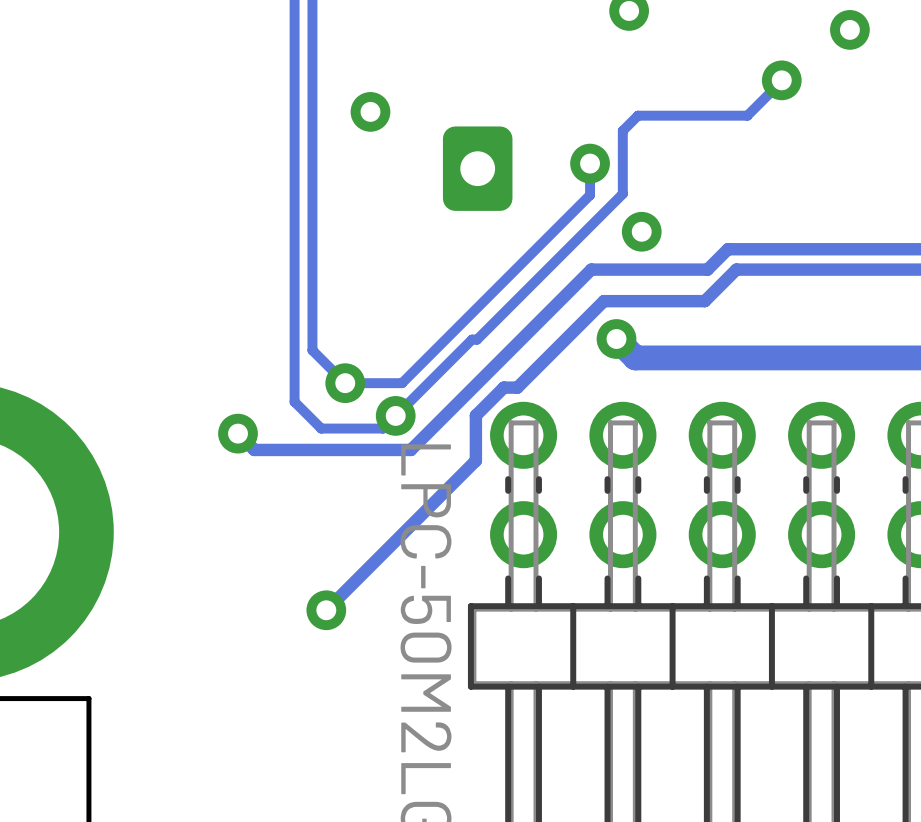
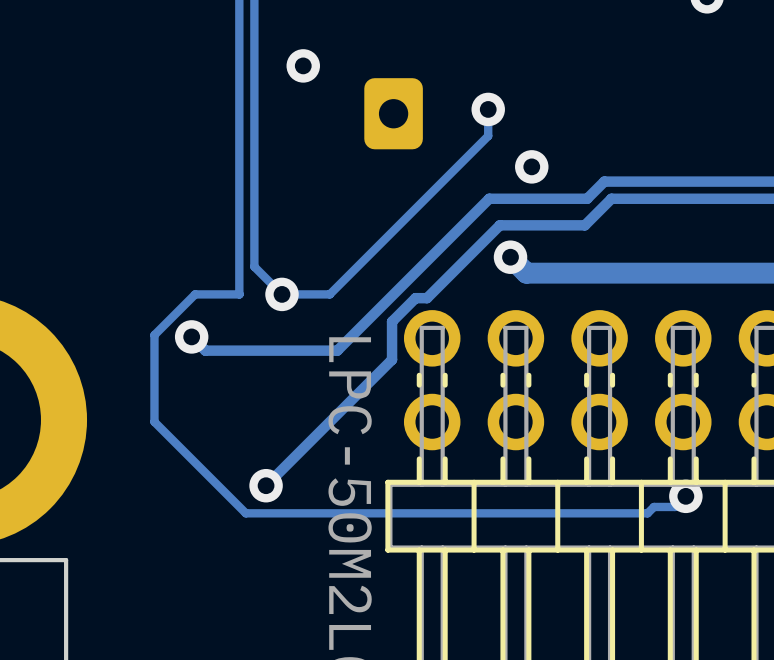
via: (781, 80) -> none
track: (781, 81) (747, 115) (637, 115) (622, 130) (622, 193) (477, 339) (472, 339) (383, 428) (321, 428) (294, 401) (294, 382) -> (685, 496) (675, 506) (653, 506) (647, 513) (245, 513) (154, 421) (154, 335) (195, 294) (239, 294)
via: (395, 415) -> none
via: none -> (685, 496)

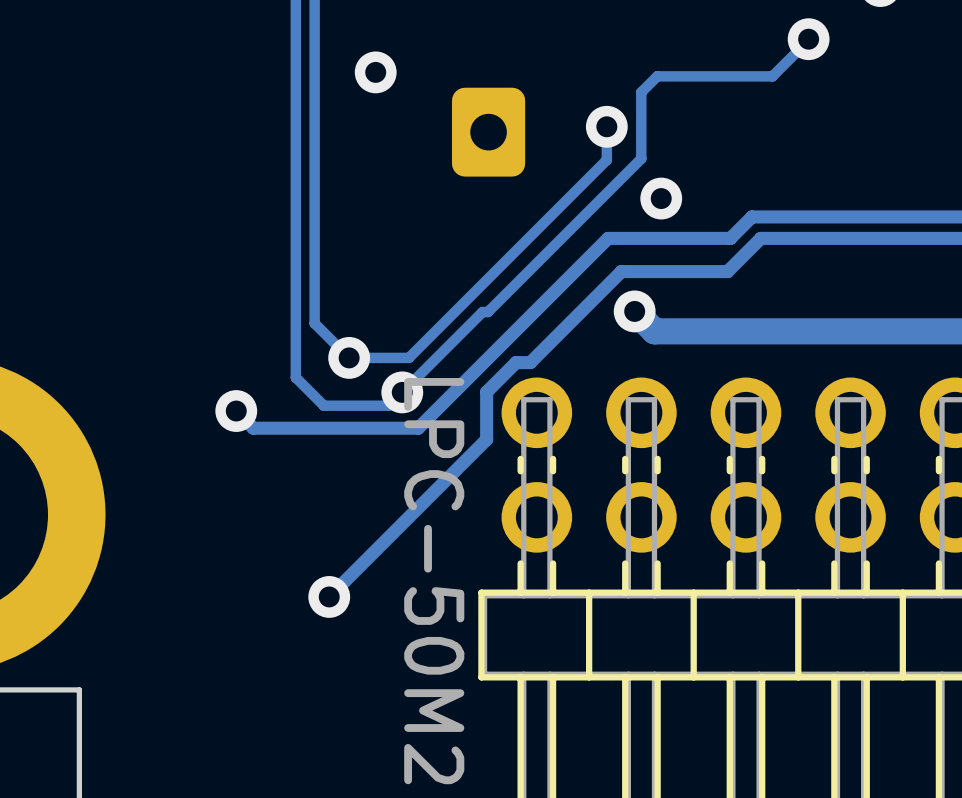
via: none -> (808, 39)
track: (239, 294) (195, 294) (154, 335) (154, 421) (245, 513) (647, 513) (653, 506) (675, 506) (685, 496) -> (295, 357) (295, 377) (323, 405) (388, 405) (482, 312) (487, 312) (641, 158) (641, 92) (657, 76) (772, 76) (808, 40)
via: none -> (402, 392)
via: (685, 496) -> none

